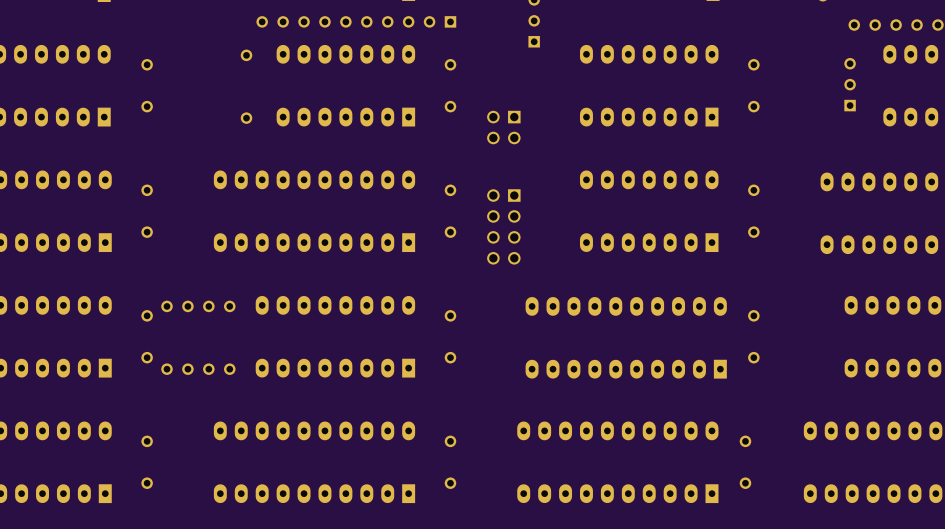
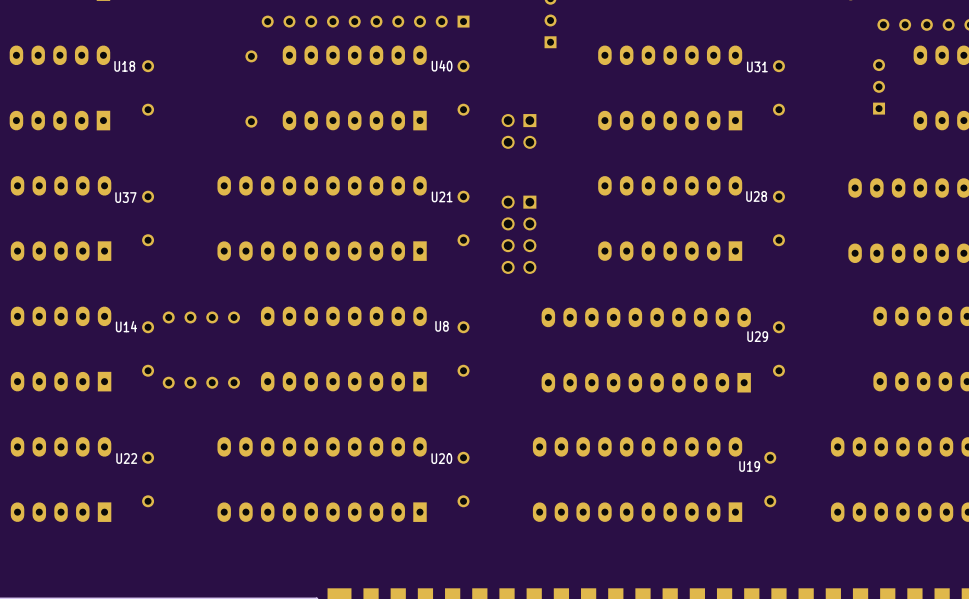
text: none -> U18 (124, 66)
text: none -> U40 (442, 65)
text: none -> U31 (757, 66)
text: none -> U21 (442, 196)
text: none -> U28 (756, 196)
text: none -> U37 (125, 197)
text: none -> U8 (442, 326)
text: none -> U14 (126, 326)
text: none -> U29 (757, 336)
text: none -> U22 (126, 458)
text: none -> U20 (441, 458)
text: none -> U19 (749, 466)

